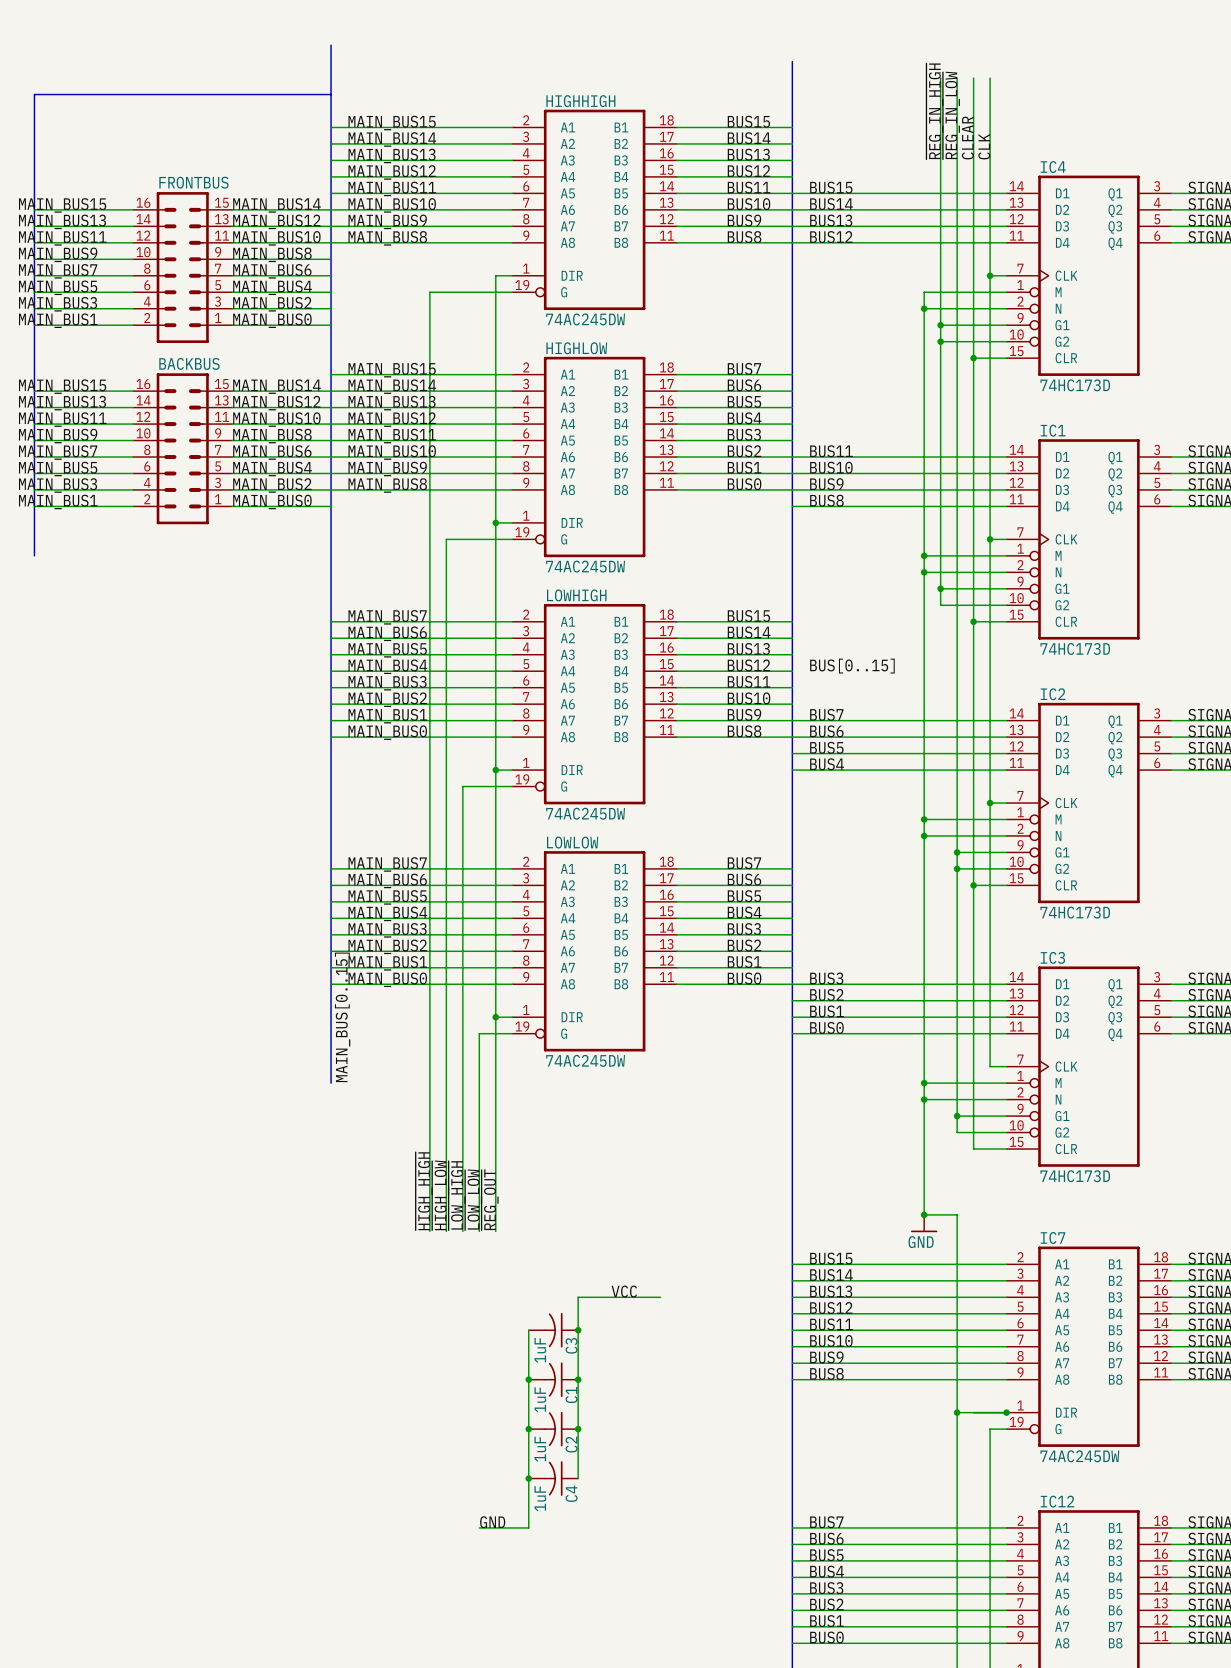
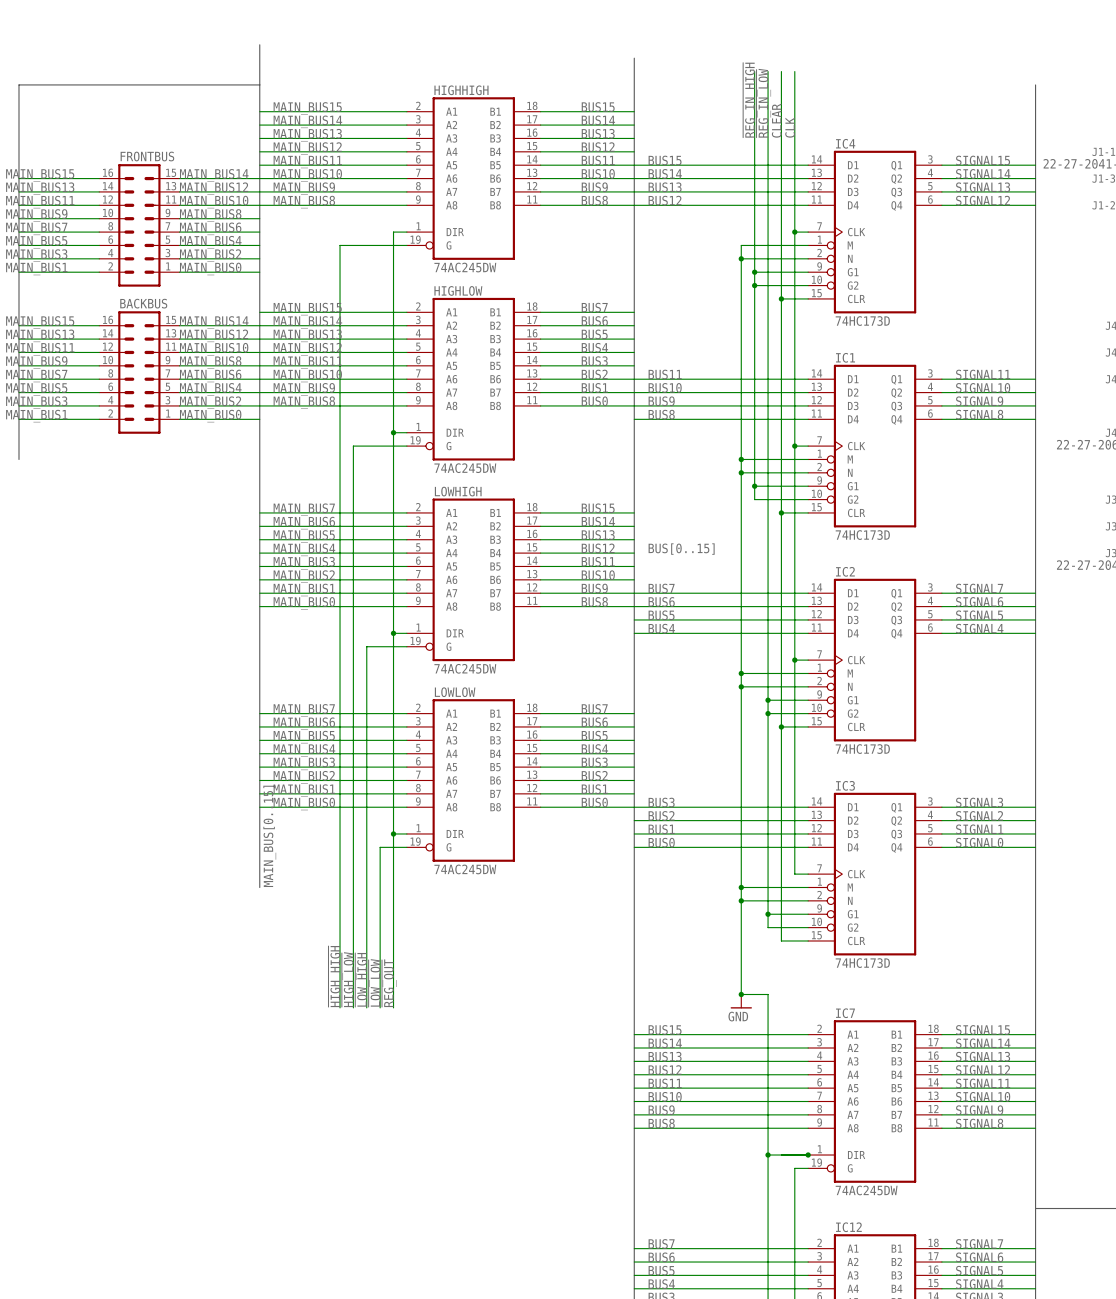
label: VCC (624, 1291) -> none
wire: (660, 1297) (578, 1297) (578, 1478) -> none
wire: (528, 1330) (528, 1527) (479, 1527) -> none
C3: 1uF (553, 1330) -> none
junction: (578, 1330) -> none
junction: (528, 1379) -> none
C1: 1uF (553, 1379) -> none
junction: (578, 1379) -> none
junction: (528, 1429) -> none
C2: 1uF (553, 1429) -> none
junction: (578, 1429) -> none
junction: (528, 1478) -> none
C4: 1uF (553, 1478) -> none
label: GND (492, 1522) -> none

